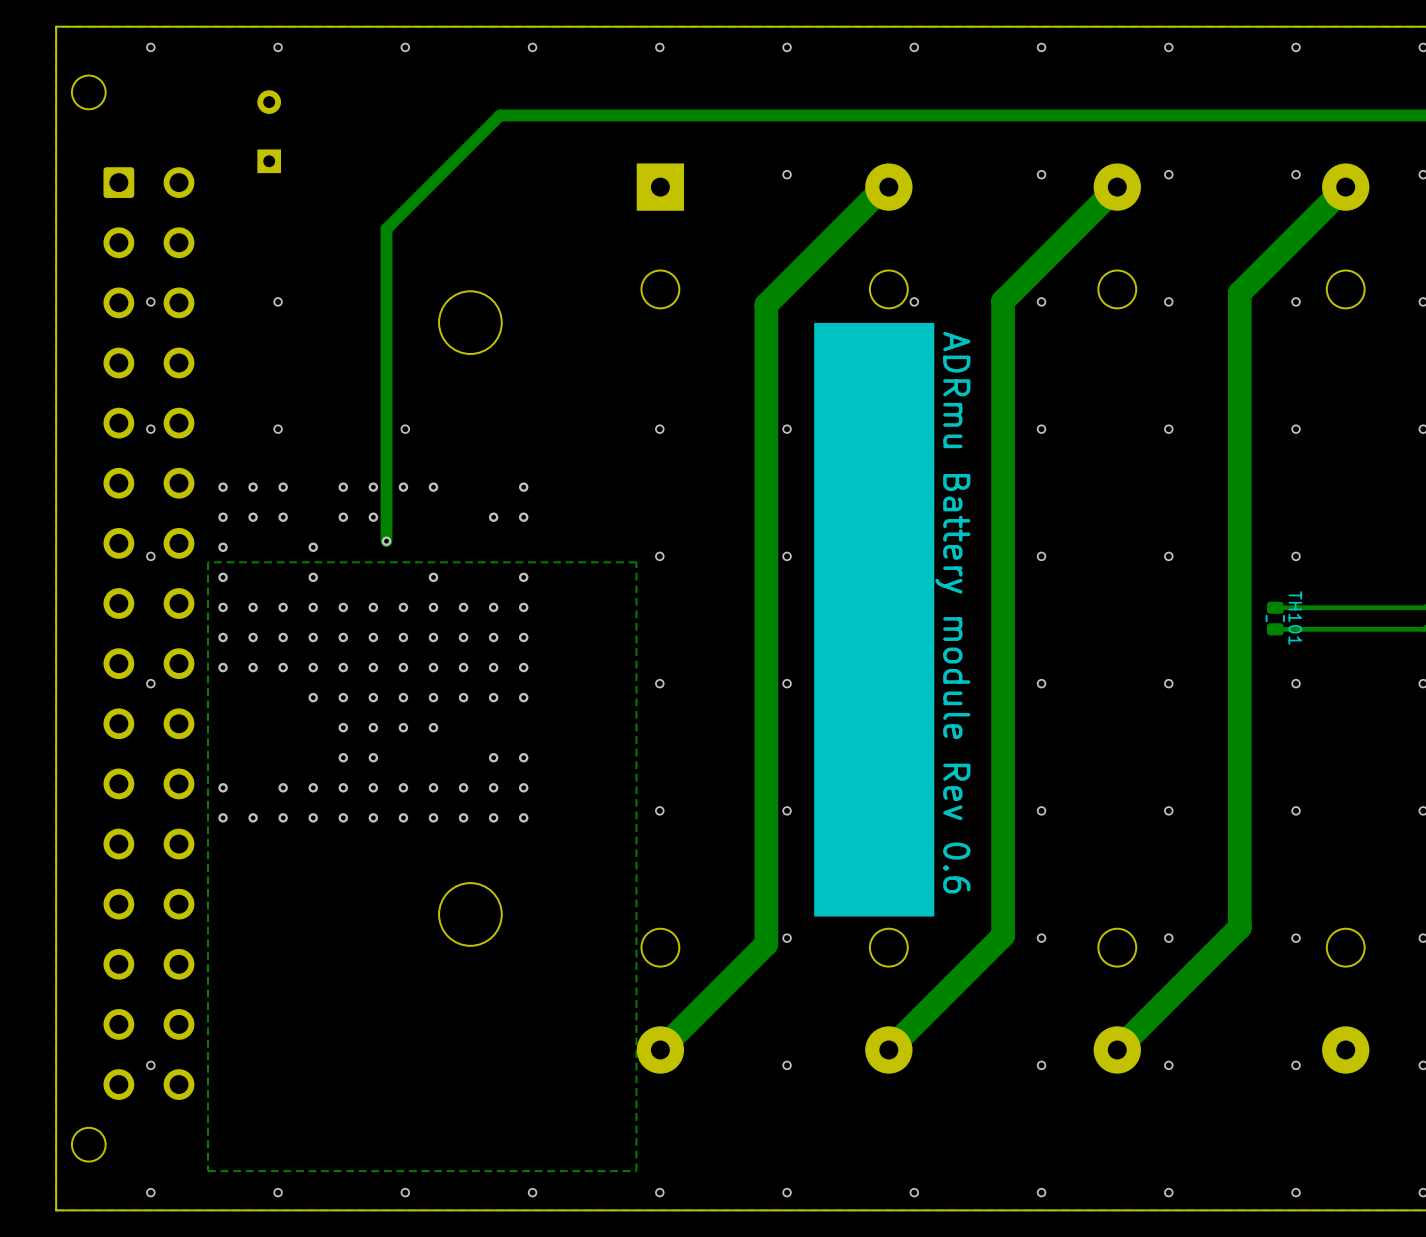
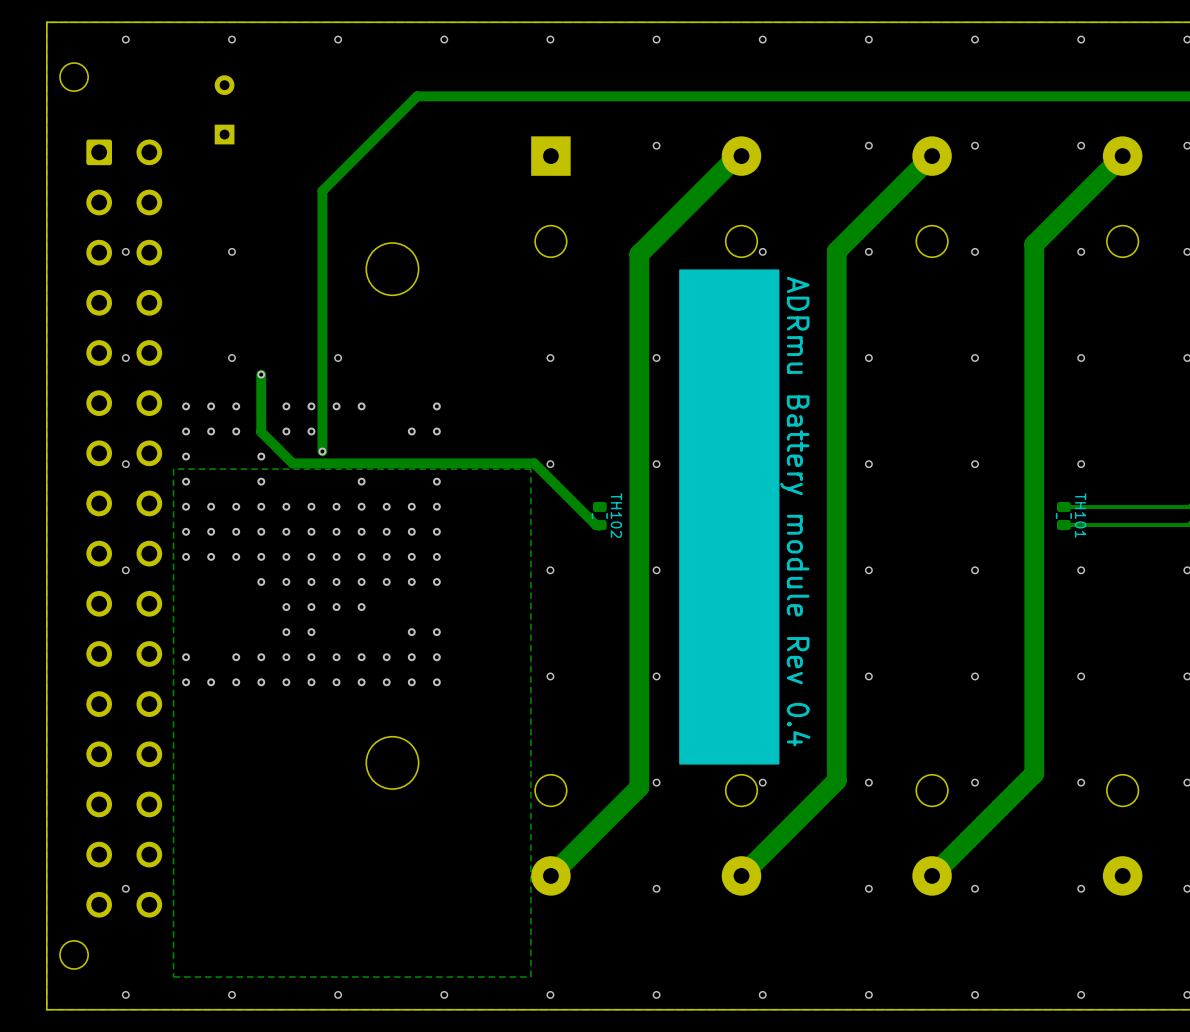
track: none -> (261, 374) (261, 432) (292, 463) (534, 463) (598, 525)
via: none -> (261, 374)
text: ADRmu Battery module Rev 0.6 (952, 612) -> ADRmu Battery module Rev 0.4 (795, 511)
TH102: none -> (599, 516)
via: none -> (762, 782)

